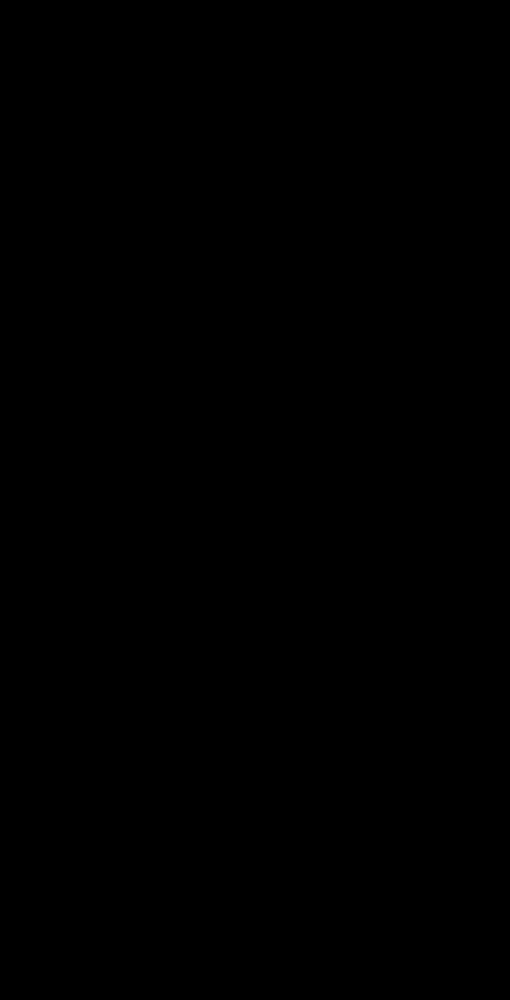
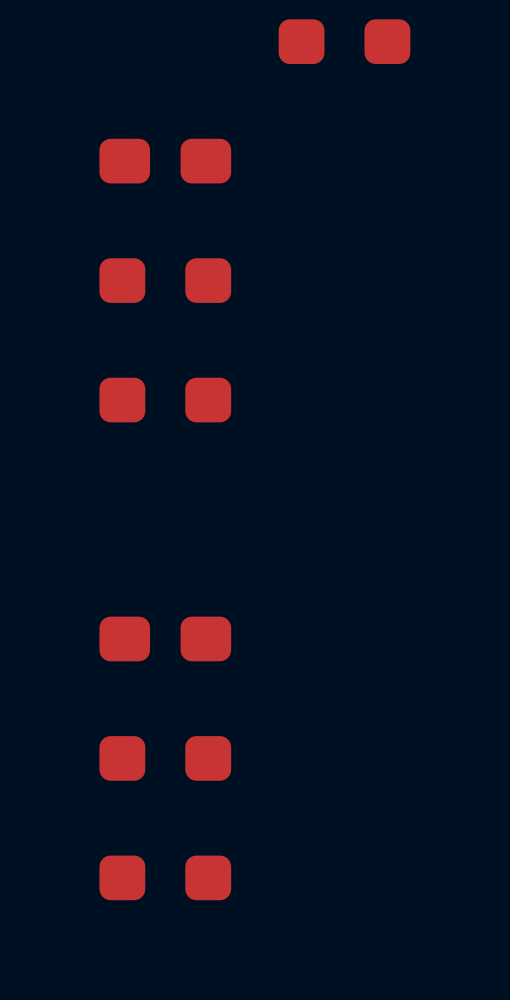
part: none -> (344, 41)
part: none -> (165, 161)
part: none -> (165, 280)
part: none -> (165, 400)
part: none -> (165, 638)
part: none -> (165, 758)
part: none -> (165, 877)

